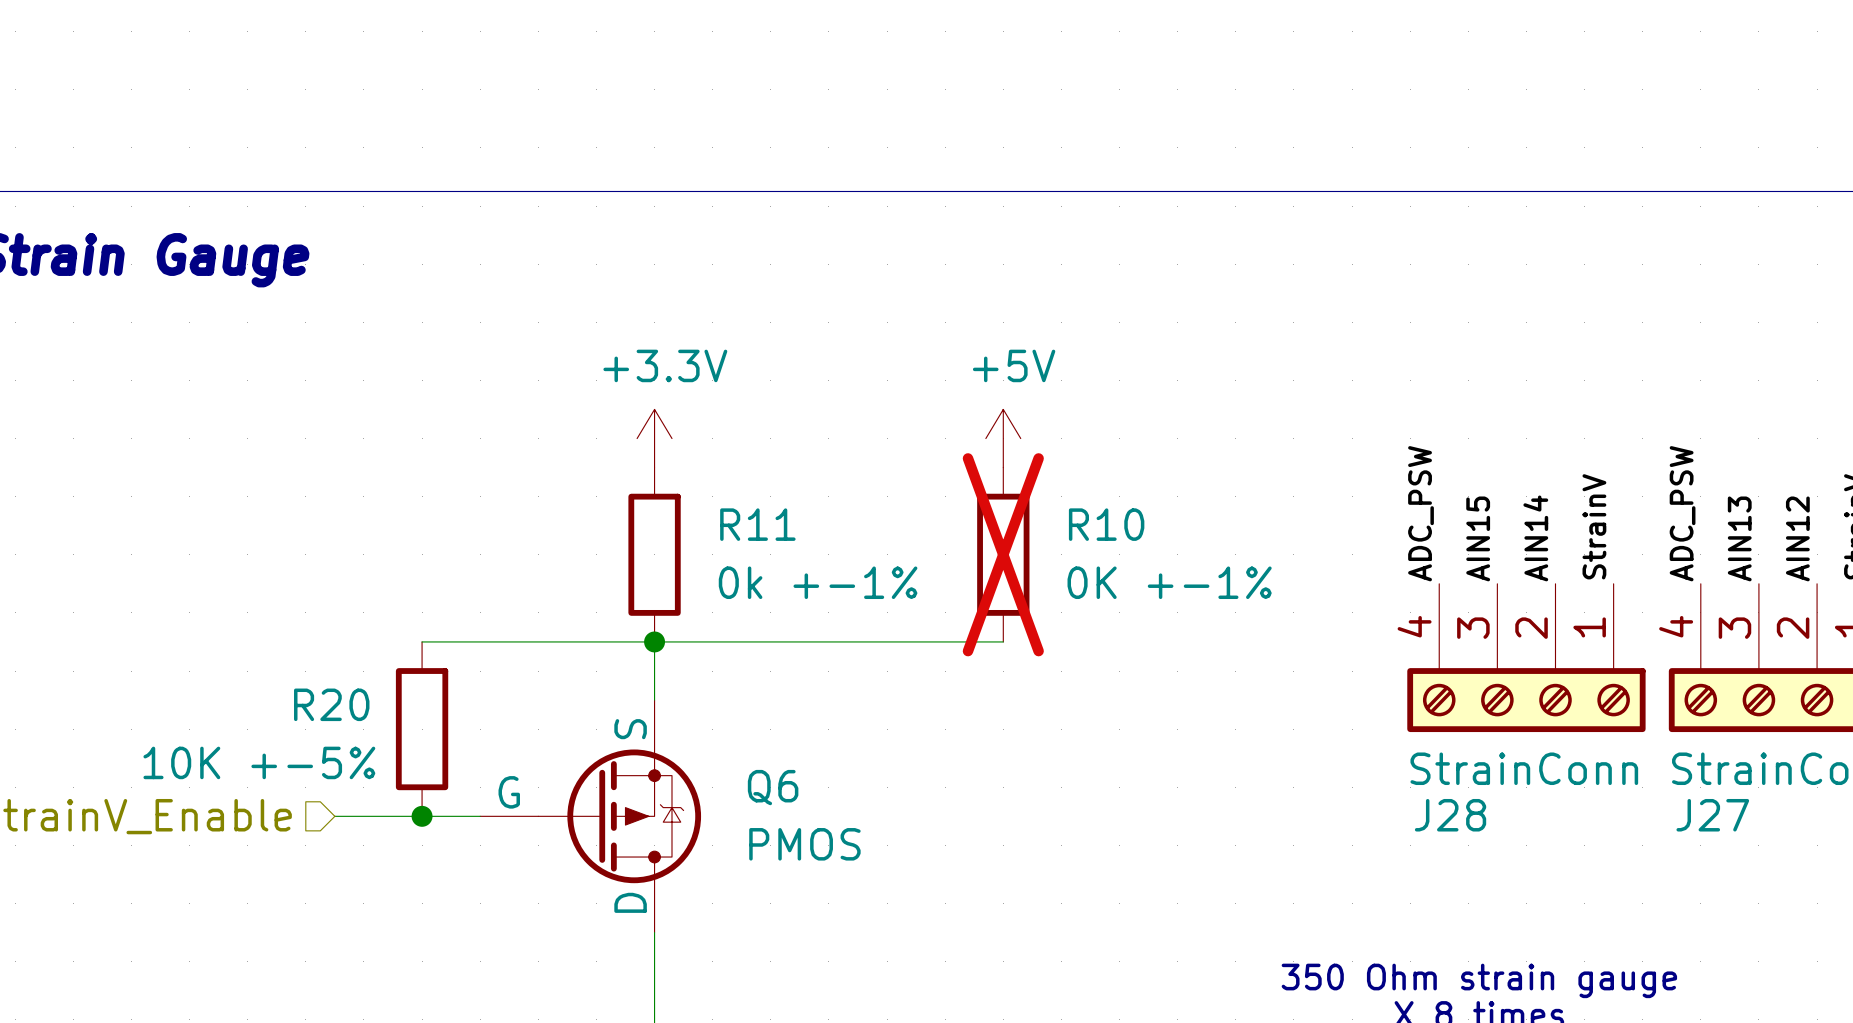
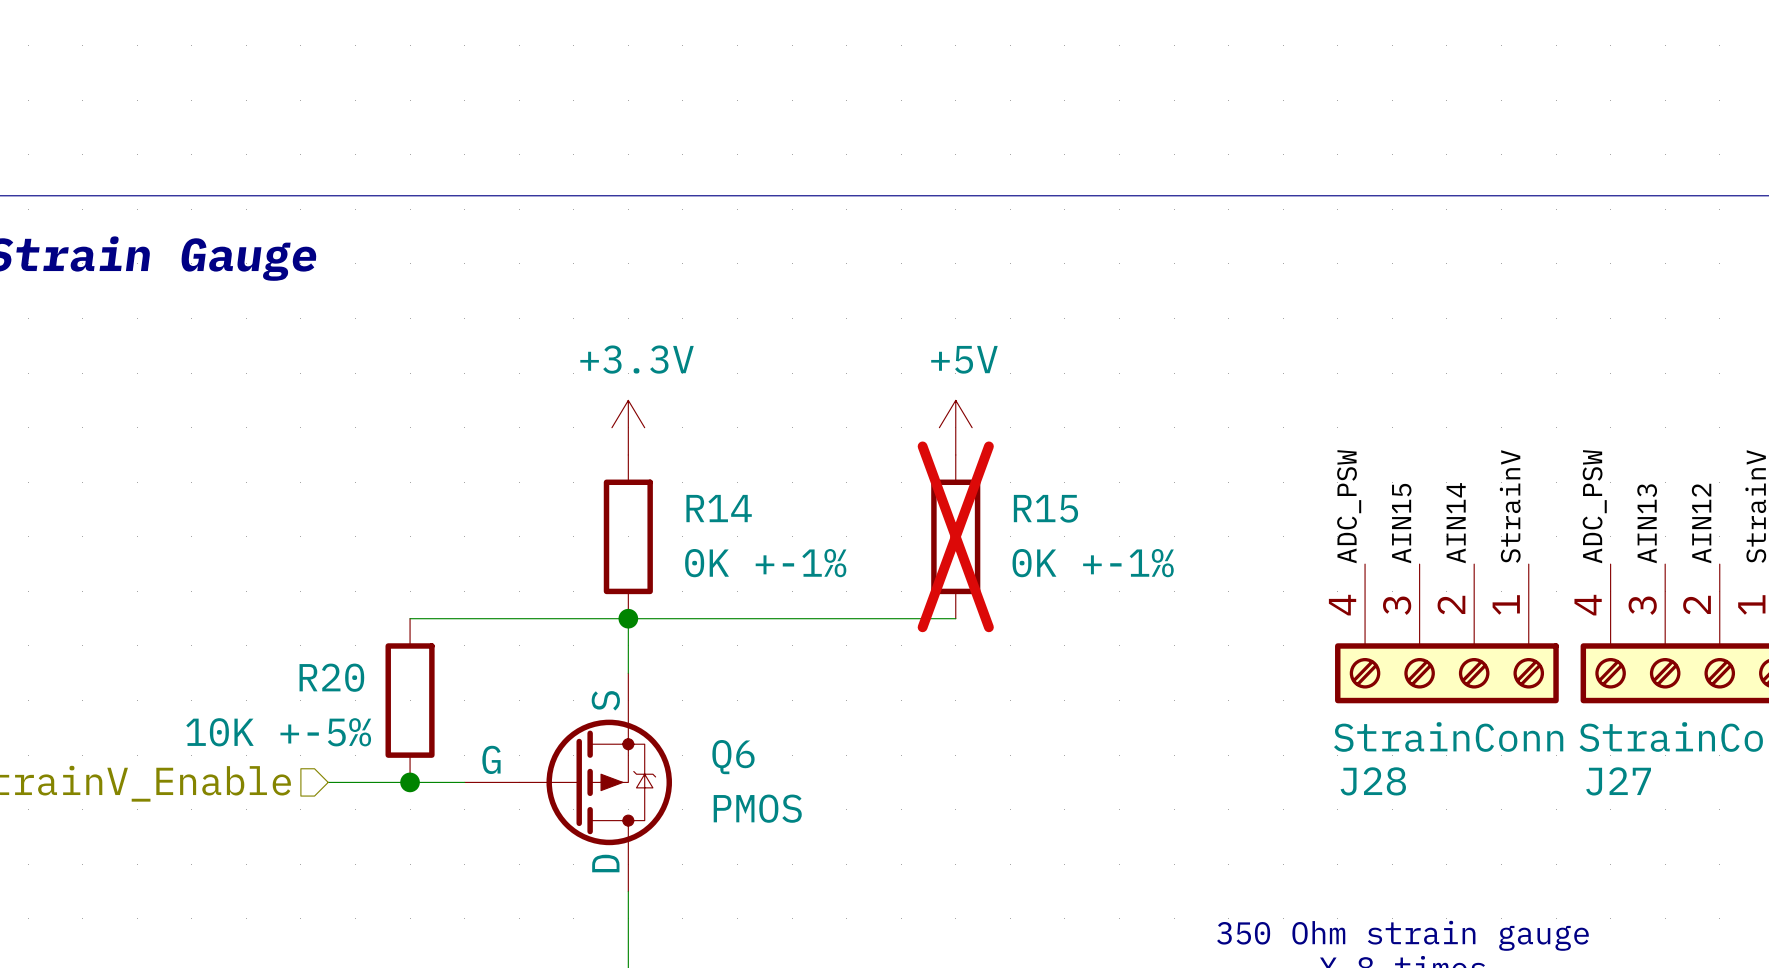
R11 name: R11 (757, 524) -> R14 (719, 508)
R10 name: R10 (1106, 524) -> R15 (1045, 508)
R11 value: 0k +-1% (818, 582) -> 0K +-1% (765, 563)

